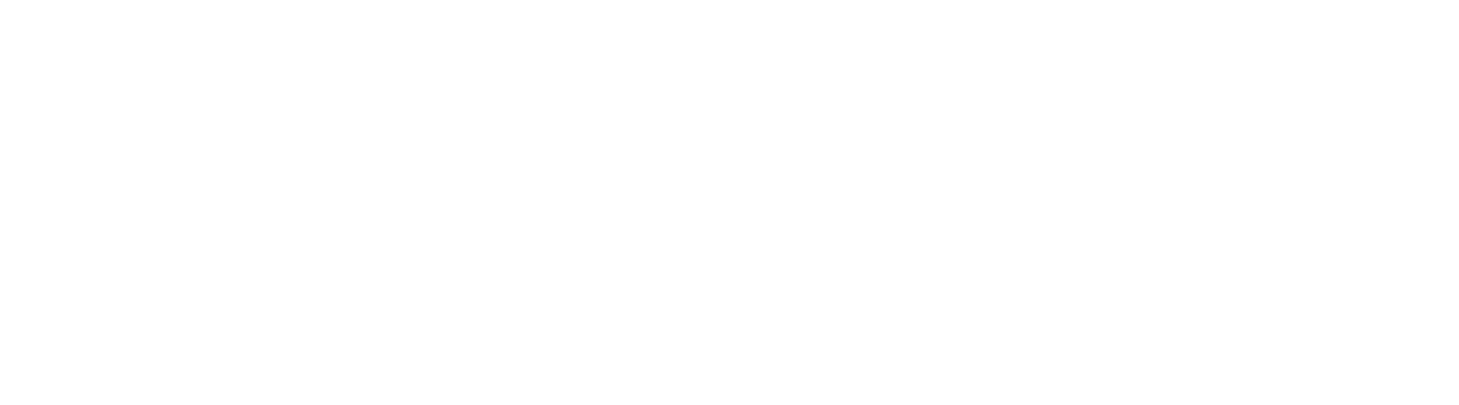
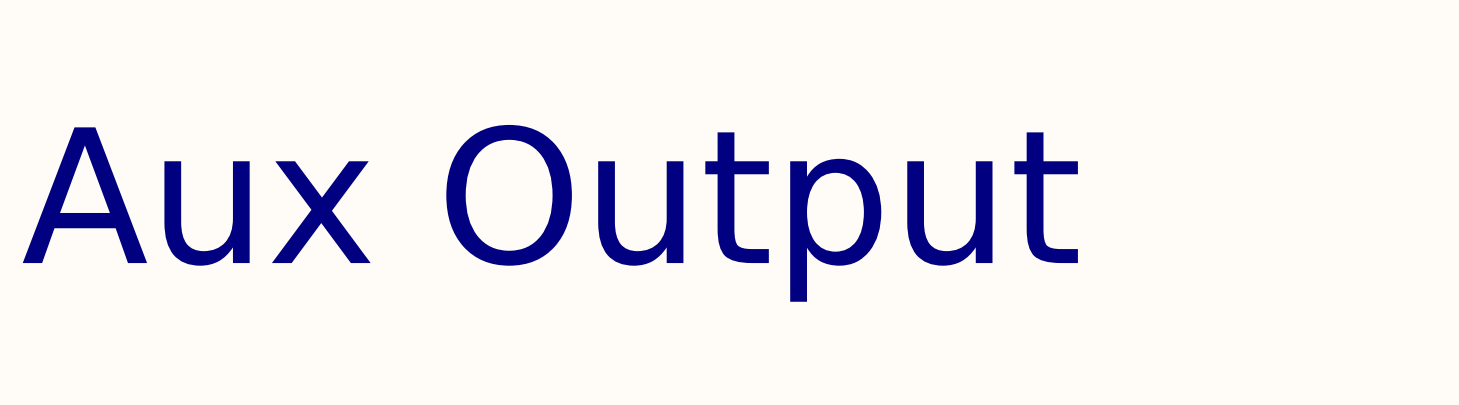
text: none -> Aux Output (550, 213)

